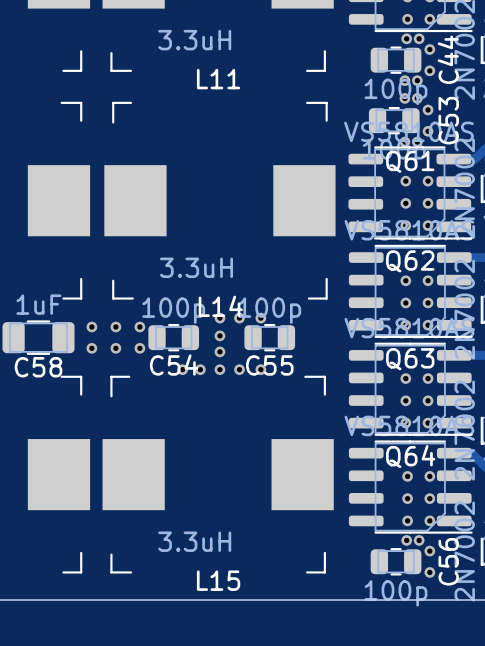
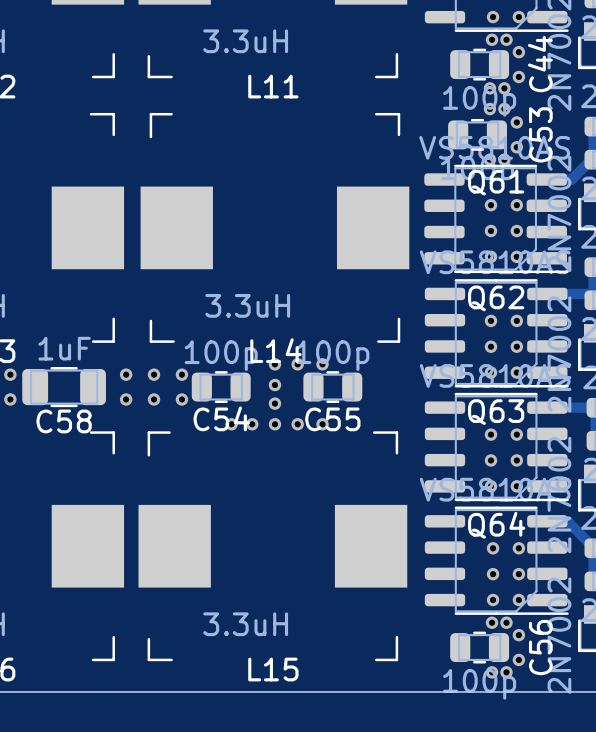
via: none -> (492, 672)
via: none -> (506, 672)

